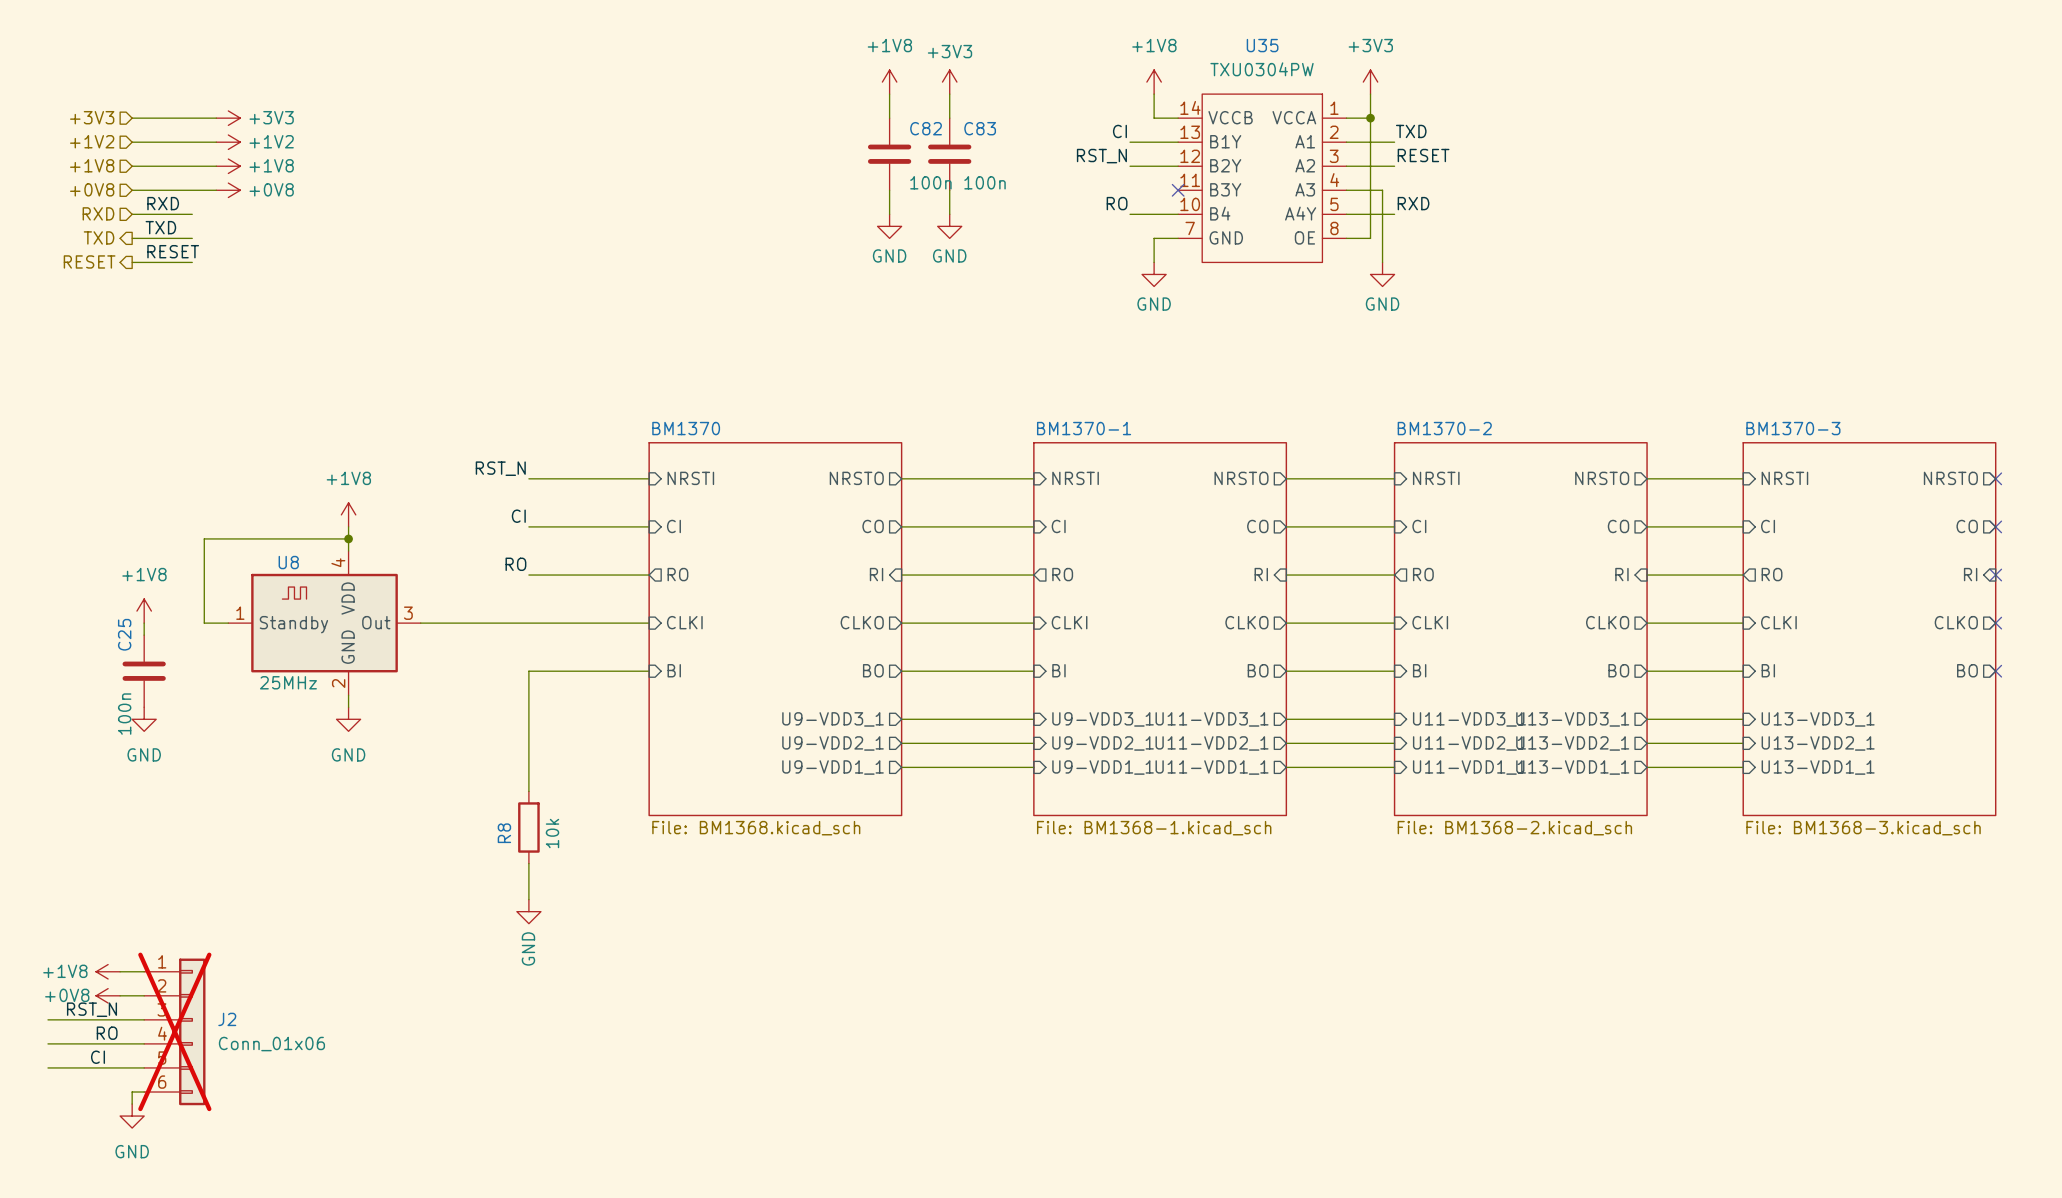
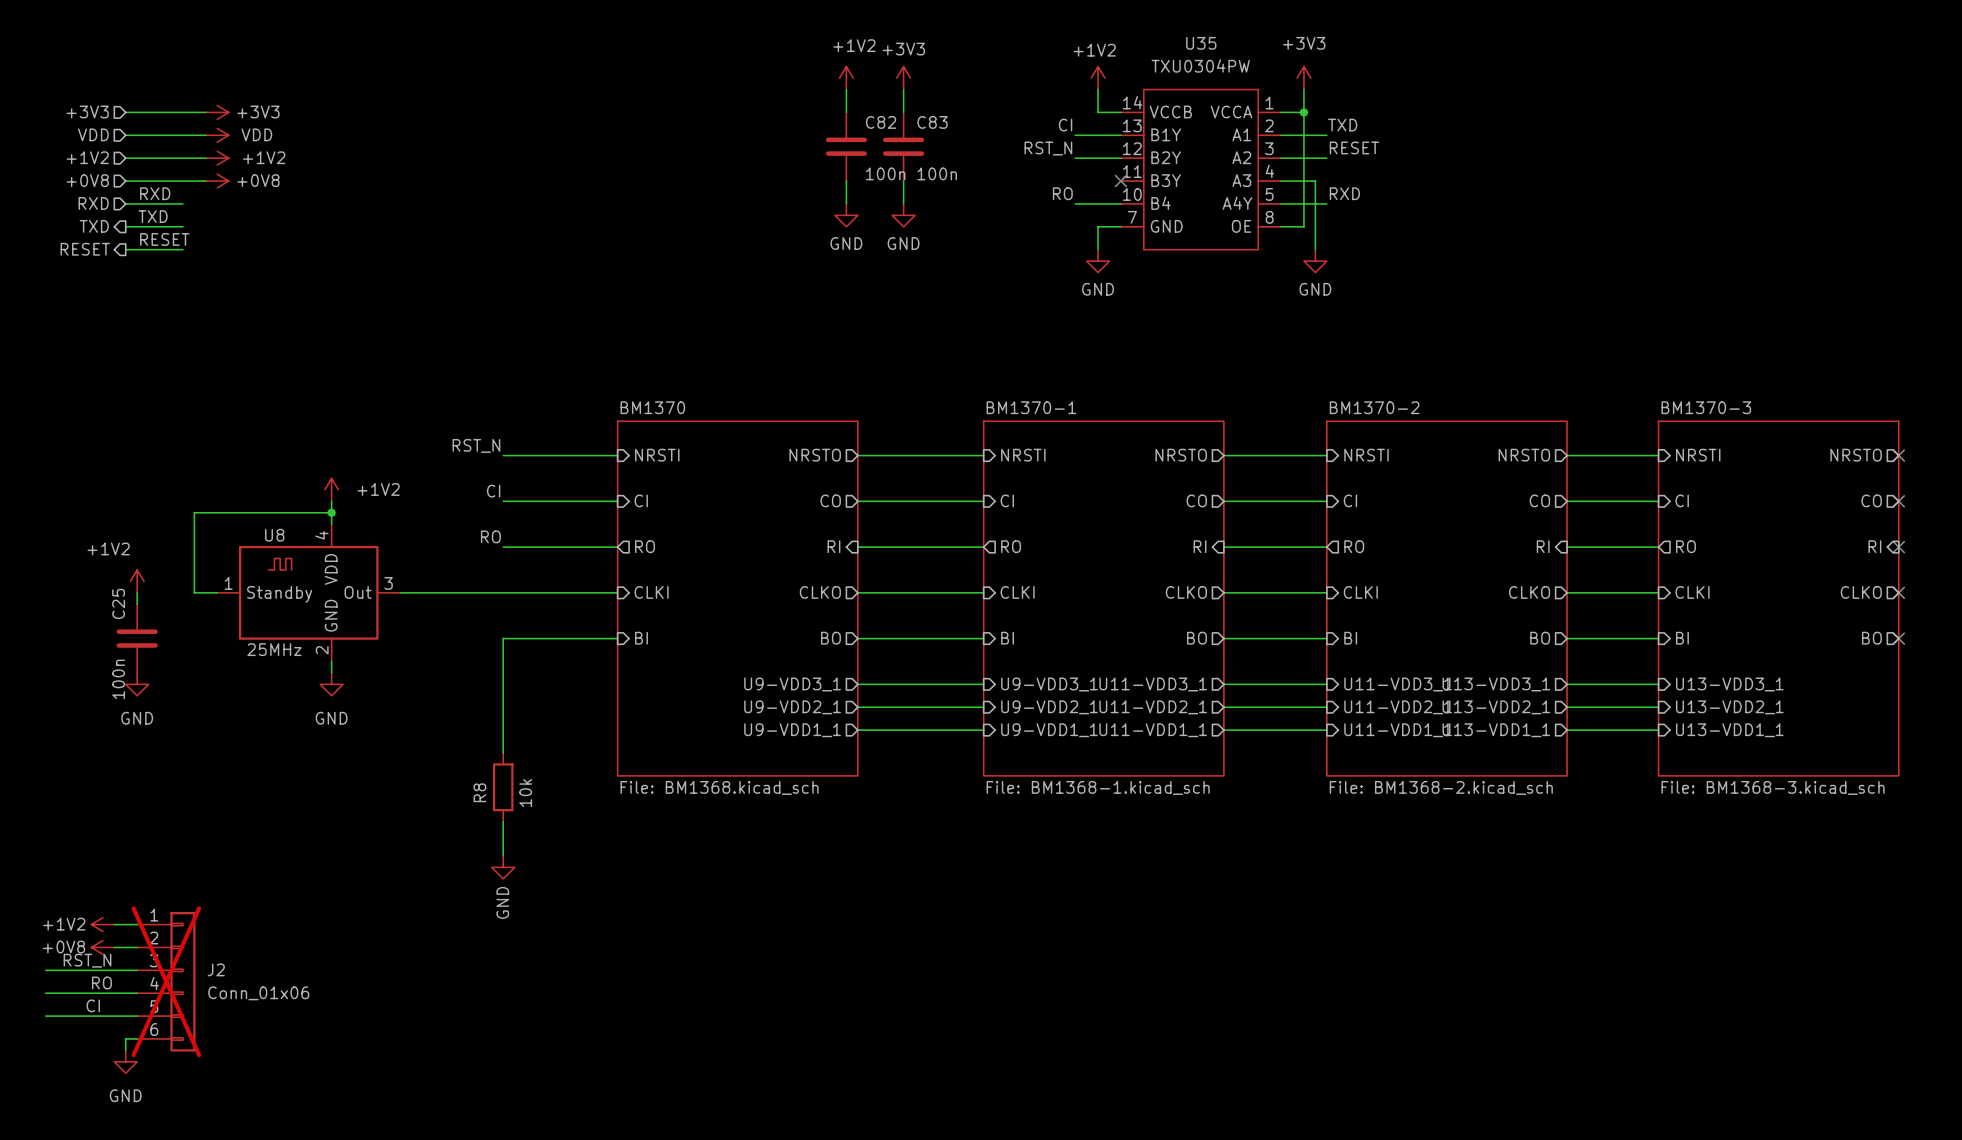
power symbol: +1V8 (889, 82) -> +1V2 (846, 78)
power symbol: +1V8 (1154, 82) -> +1V2 (1098, 78)
hierarchical label: +1V2 (92, 141) -> VDD (93, 134)
power symbol: +1V2 (228, 142) -> VDD (217, 135)
hierarchical label: +1V8 (92, 165) -> +1V2 (87, 157)
power symbol: +1V8 (228, 166) -> +1V2 (217, 158)
power symbol: +1V8 (348, 514) -> +1V2 (331, 489)
power symbol: +1V8 (144, 611) -> +1V2 (137, 581)
power symbol: +1V8 (108, 971) -> +1V2 (102, 924)

